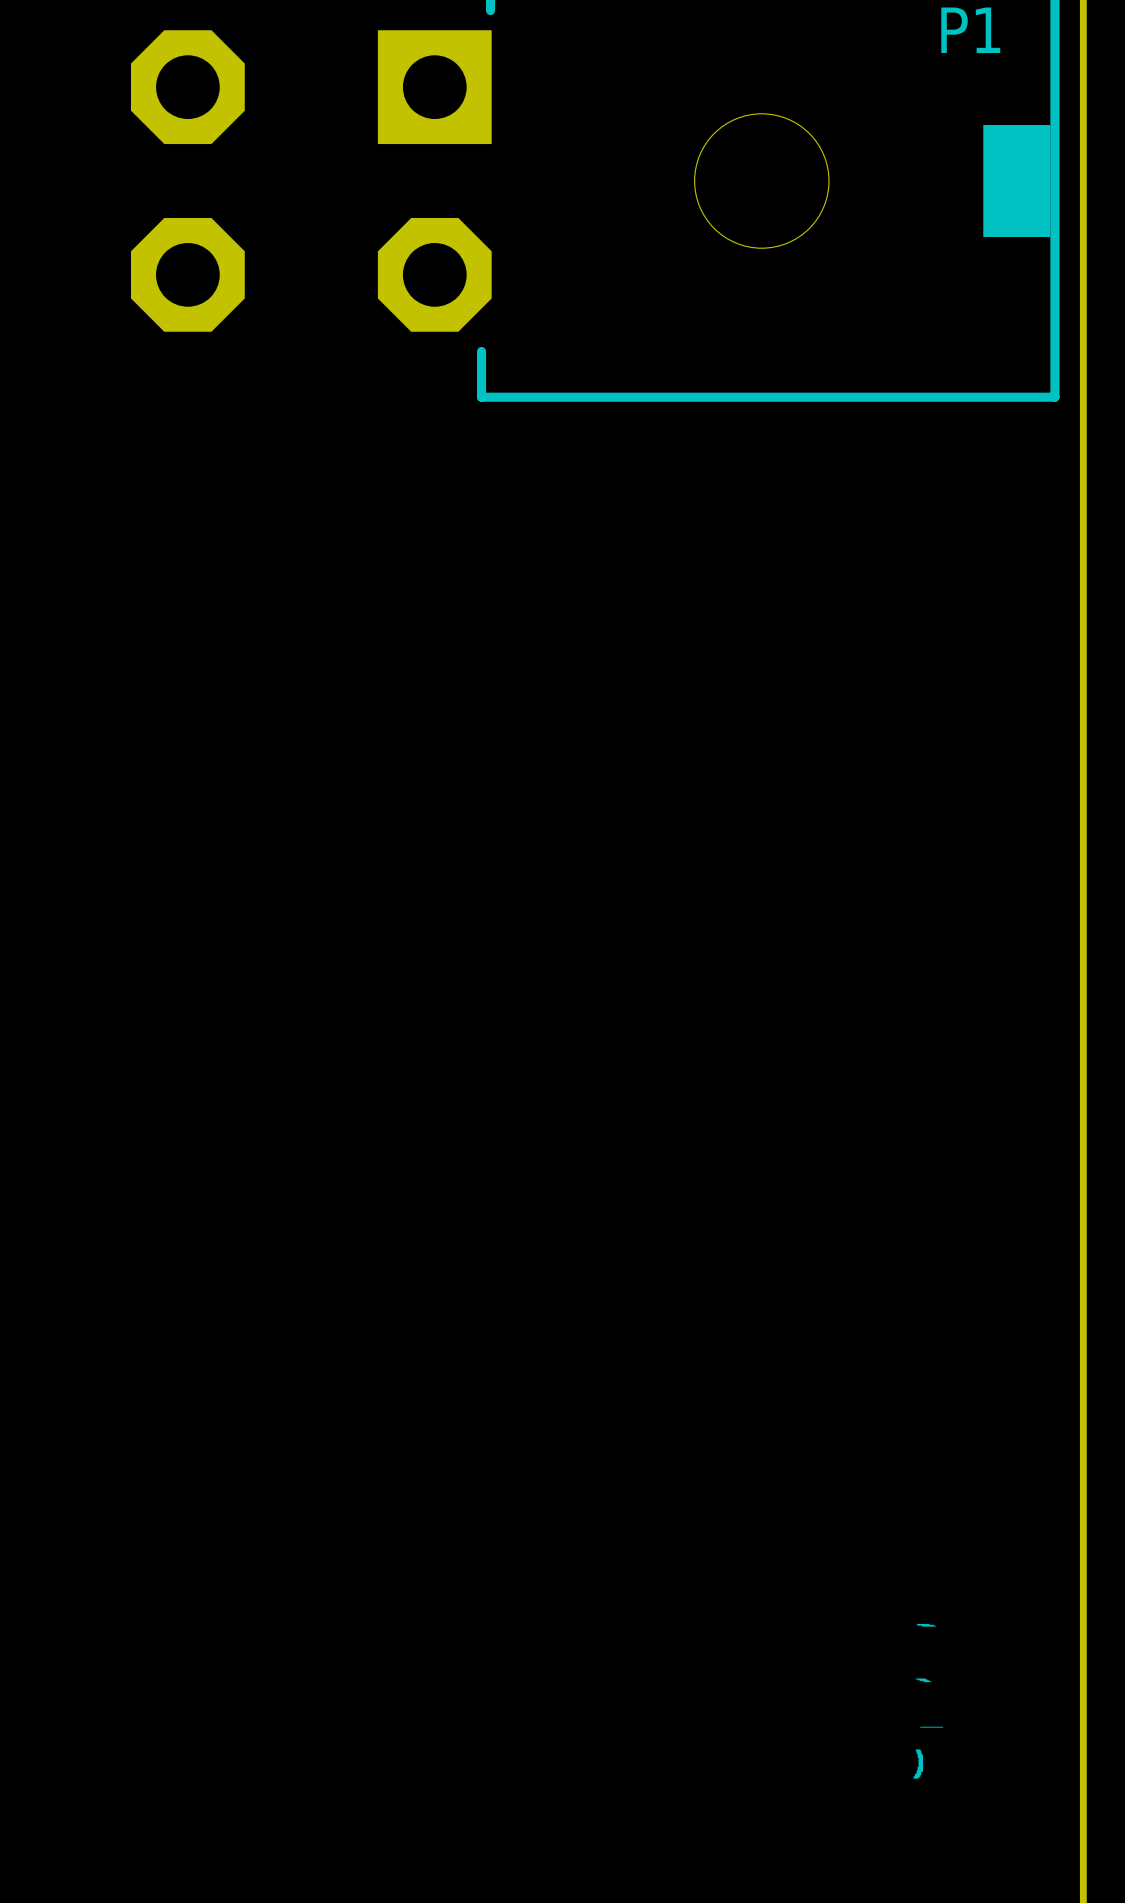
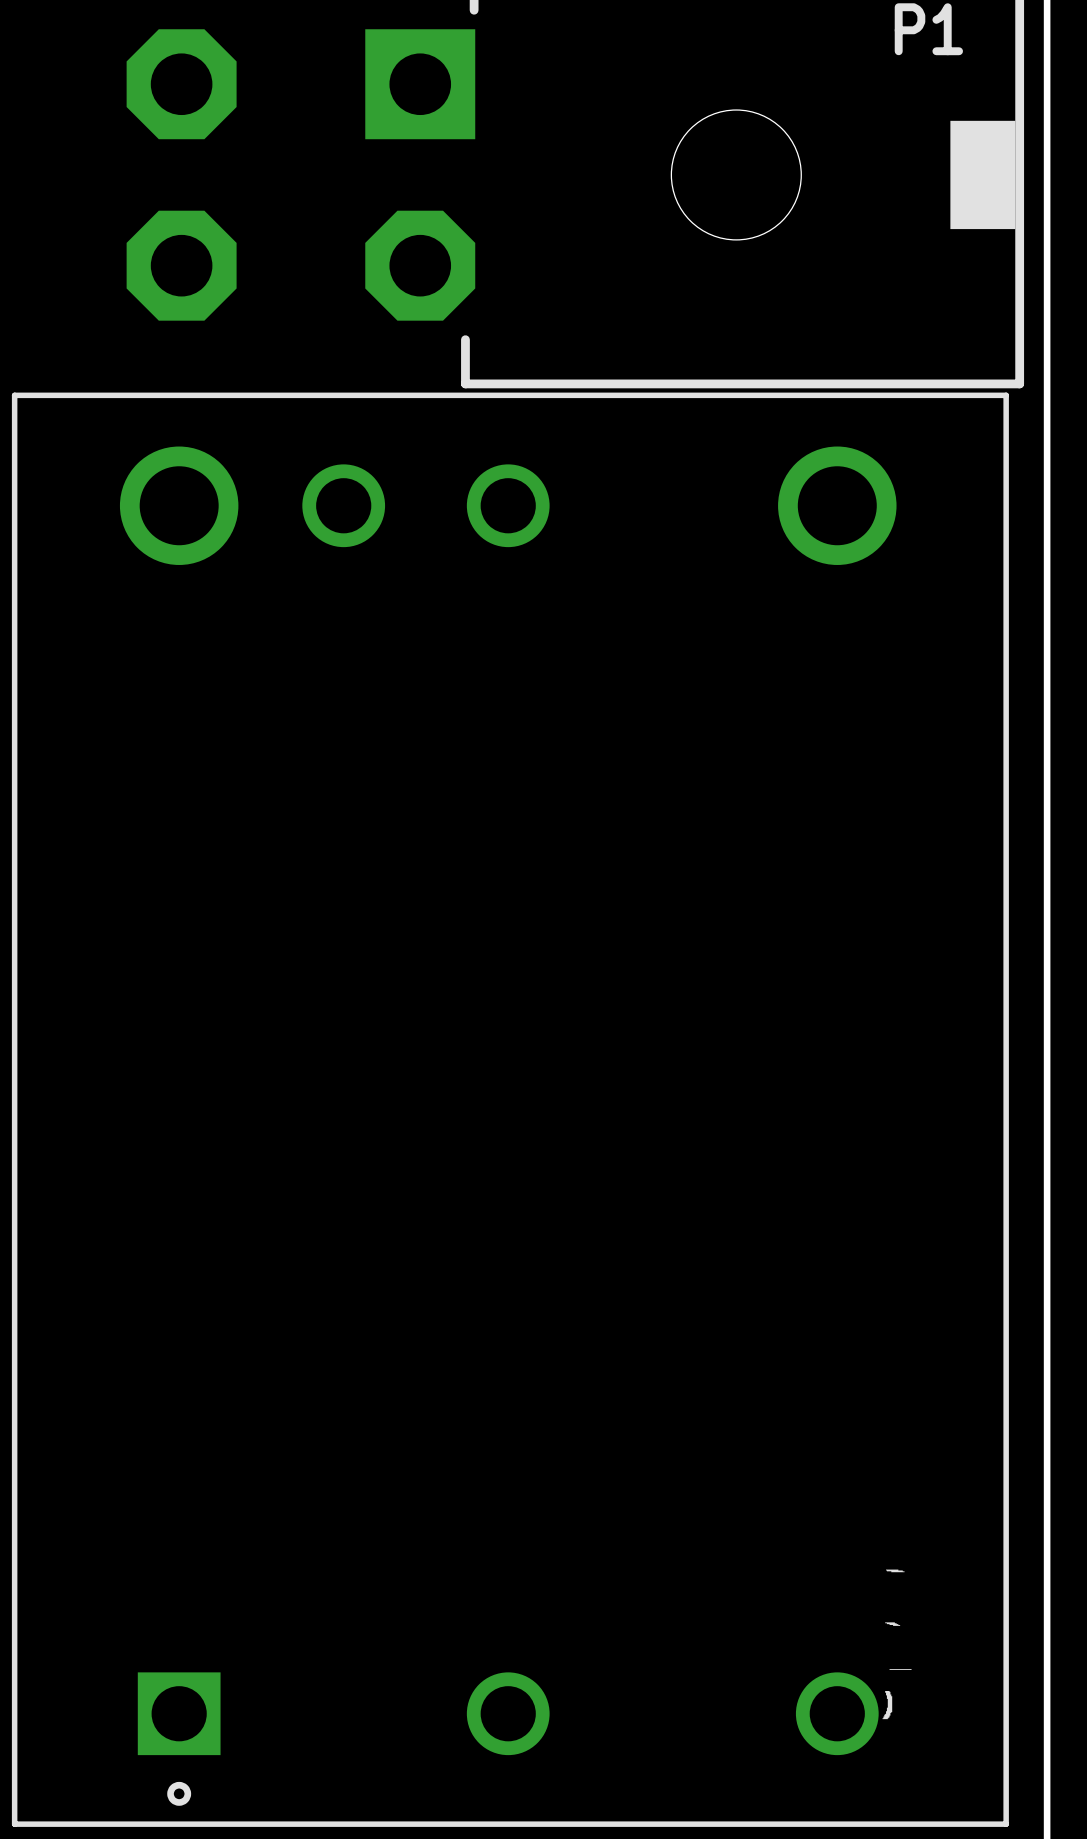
part: none -> (510, 1109)

